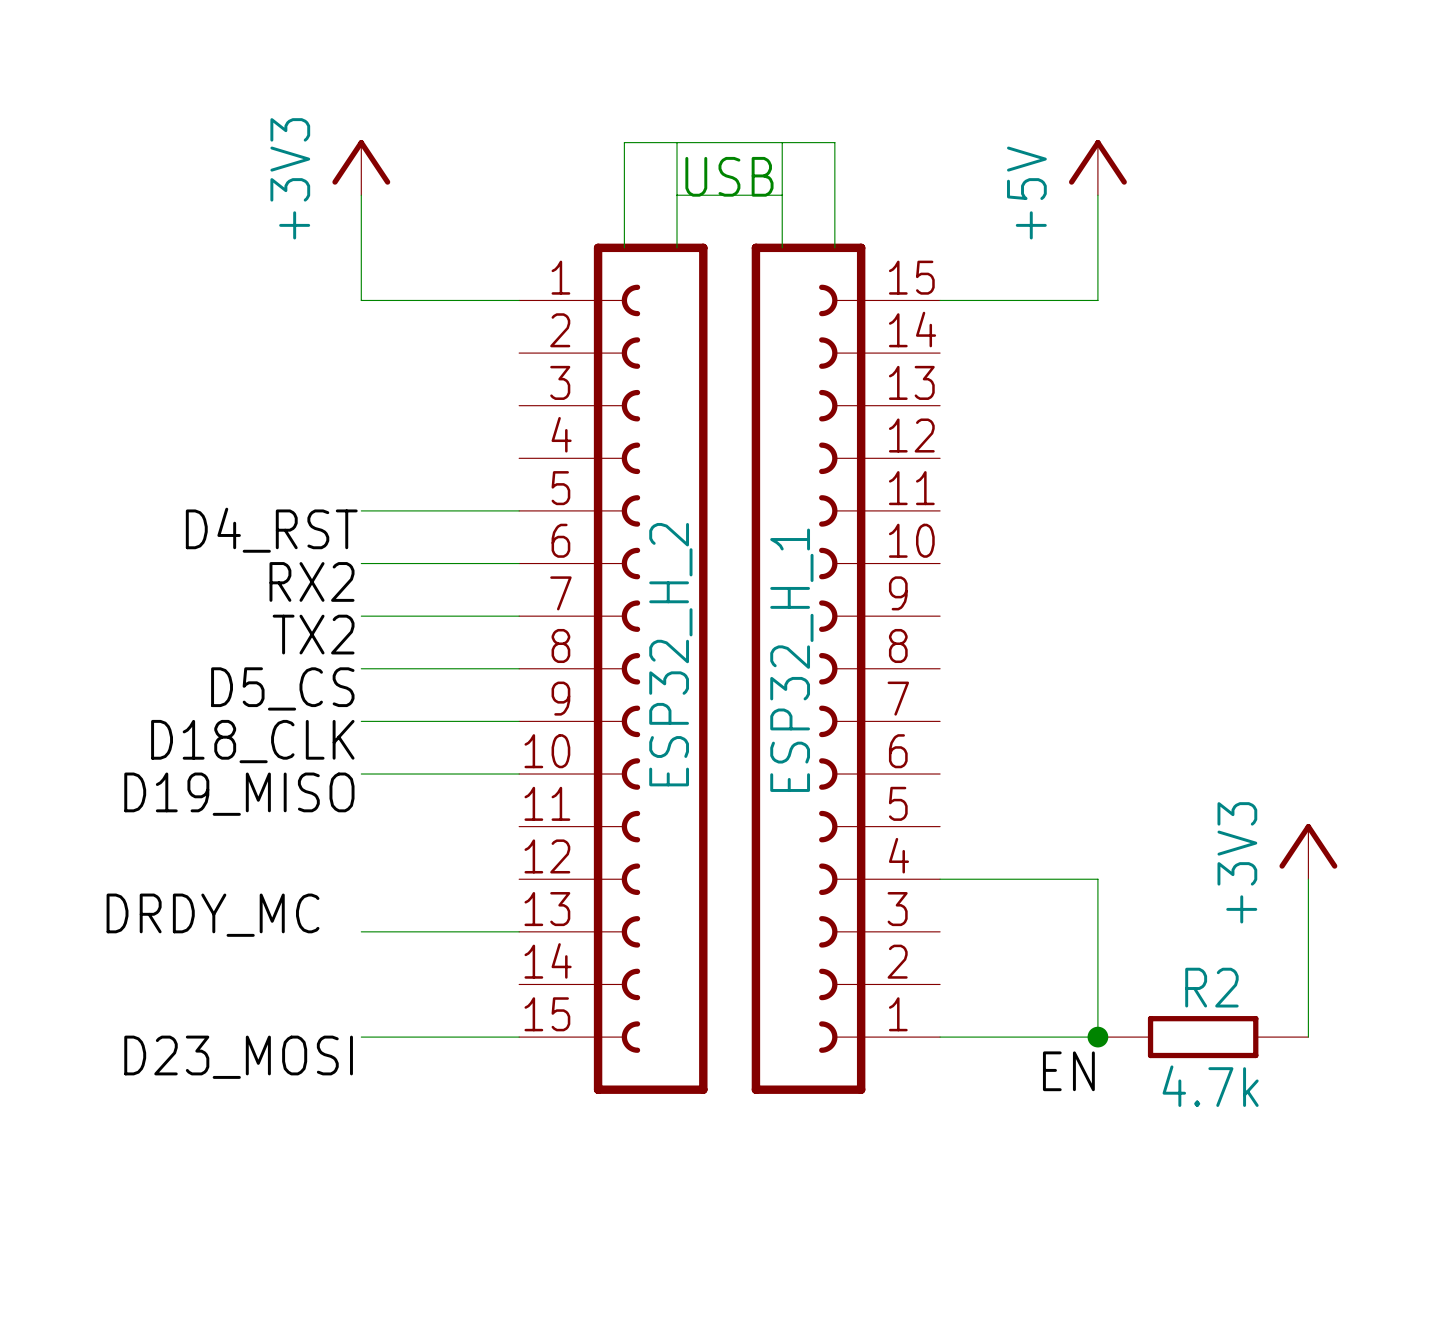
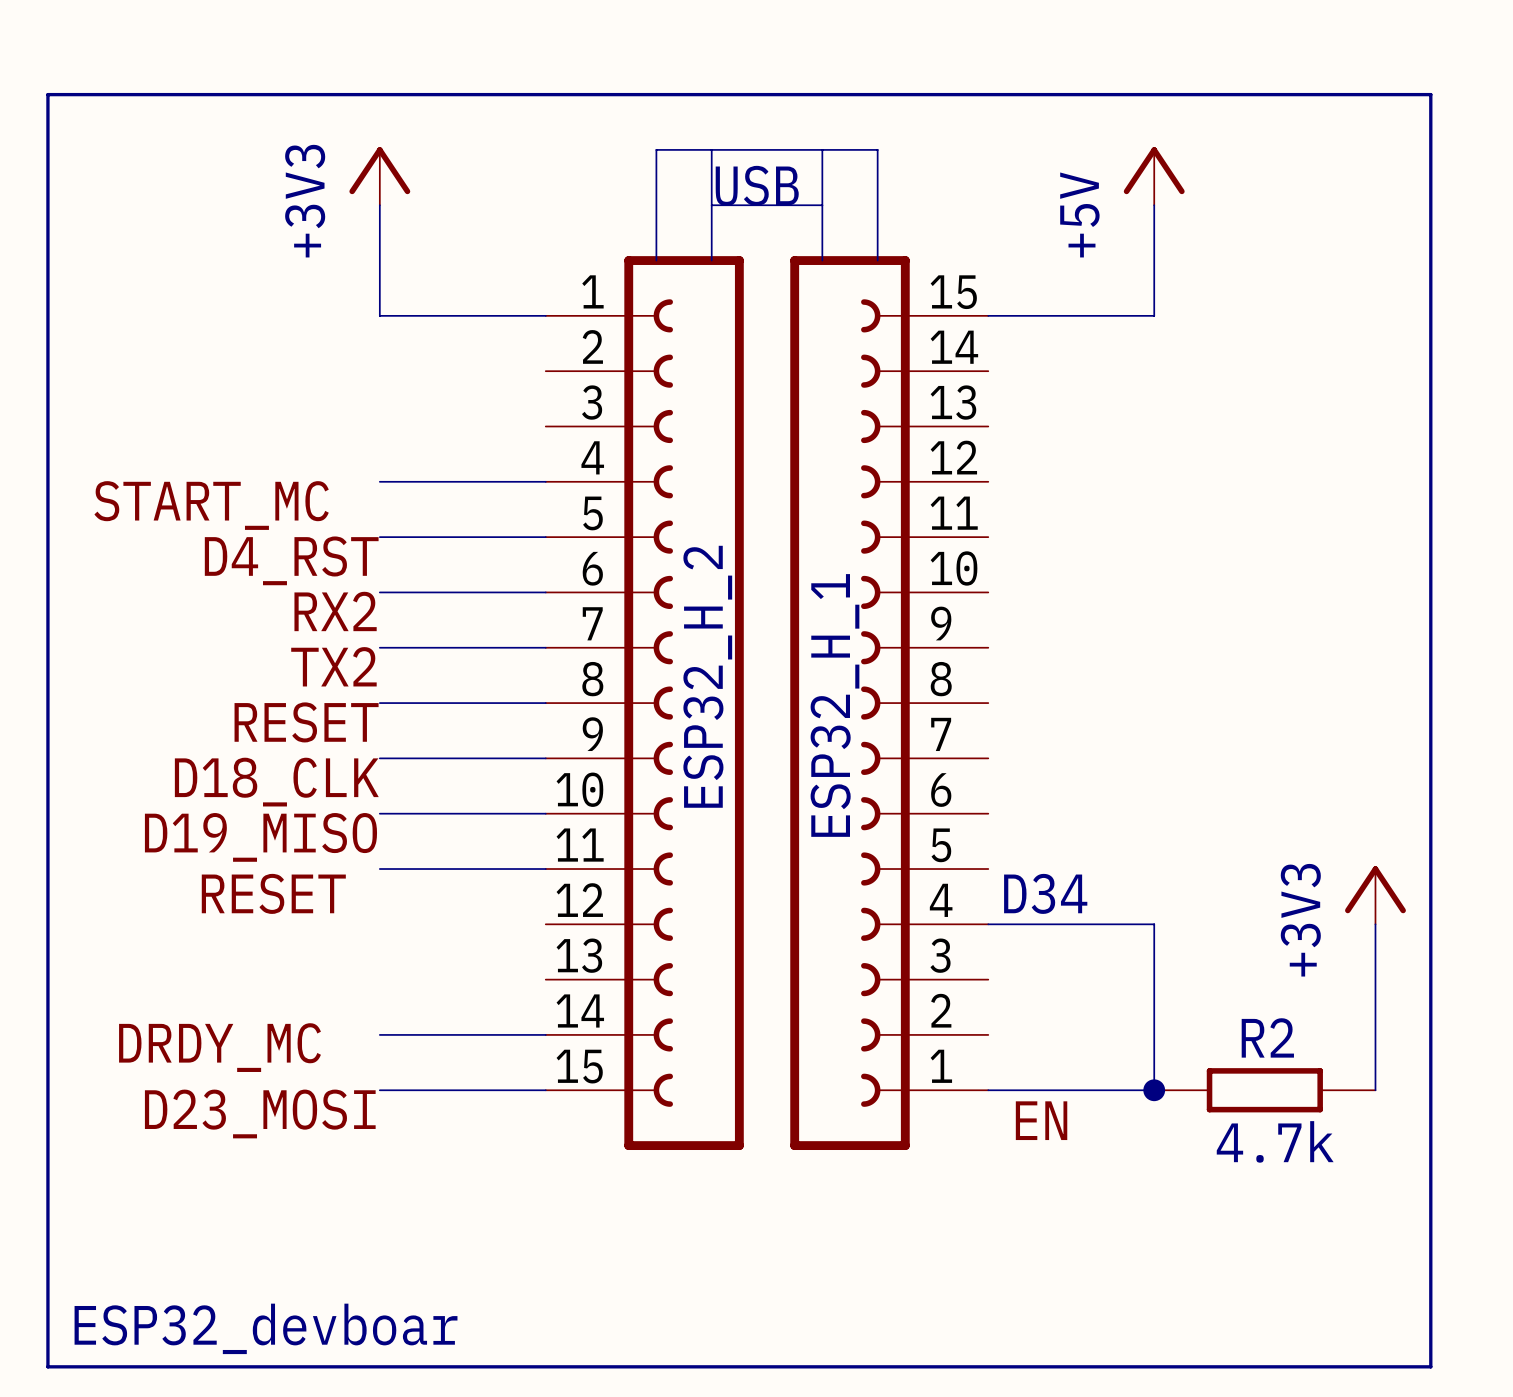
line: none -> (47, 94) (1430, 94) (1430, 1366) (47, 1366) (47, 94)
wire: none -> (379, 481) (545, 481)
label: none -> START_MC (211, 505)
label: D5_CS (282, 688) -> RESET (306, 722)
wire: none -> (379, 869) (545, 869)
text: none -> D34 (1045, 893)
label: none -> RESET (273, 893)
label position: DRDY_MC (213, 915) -> DRDY_MC (219, 1047)
wire: (361, 931) (519, 931) -> (379, 1034) (545, 1034)
label position: EN (1068, 1071) -> EN (1041, 1120)
text: none -> ESP32_devboar (266, 1328)

